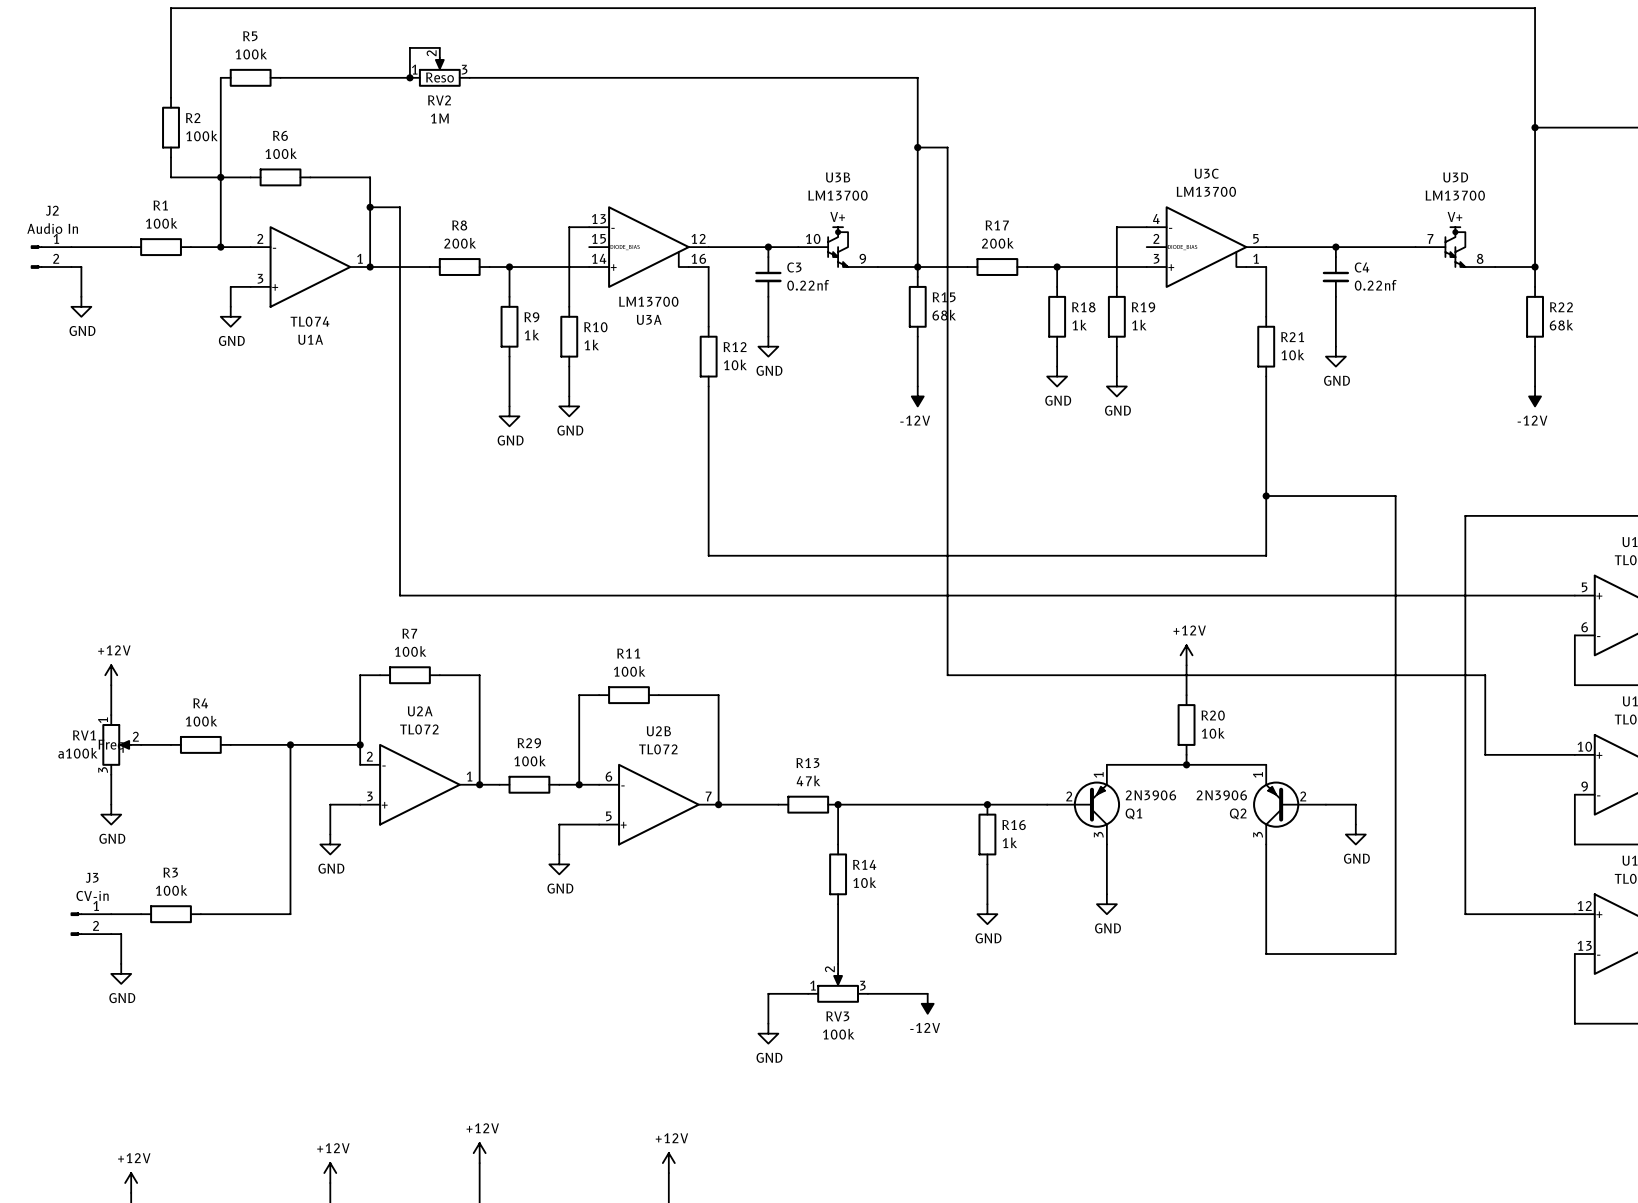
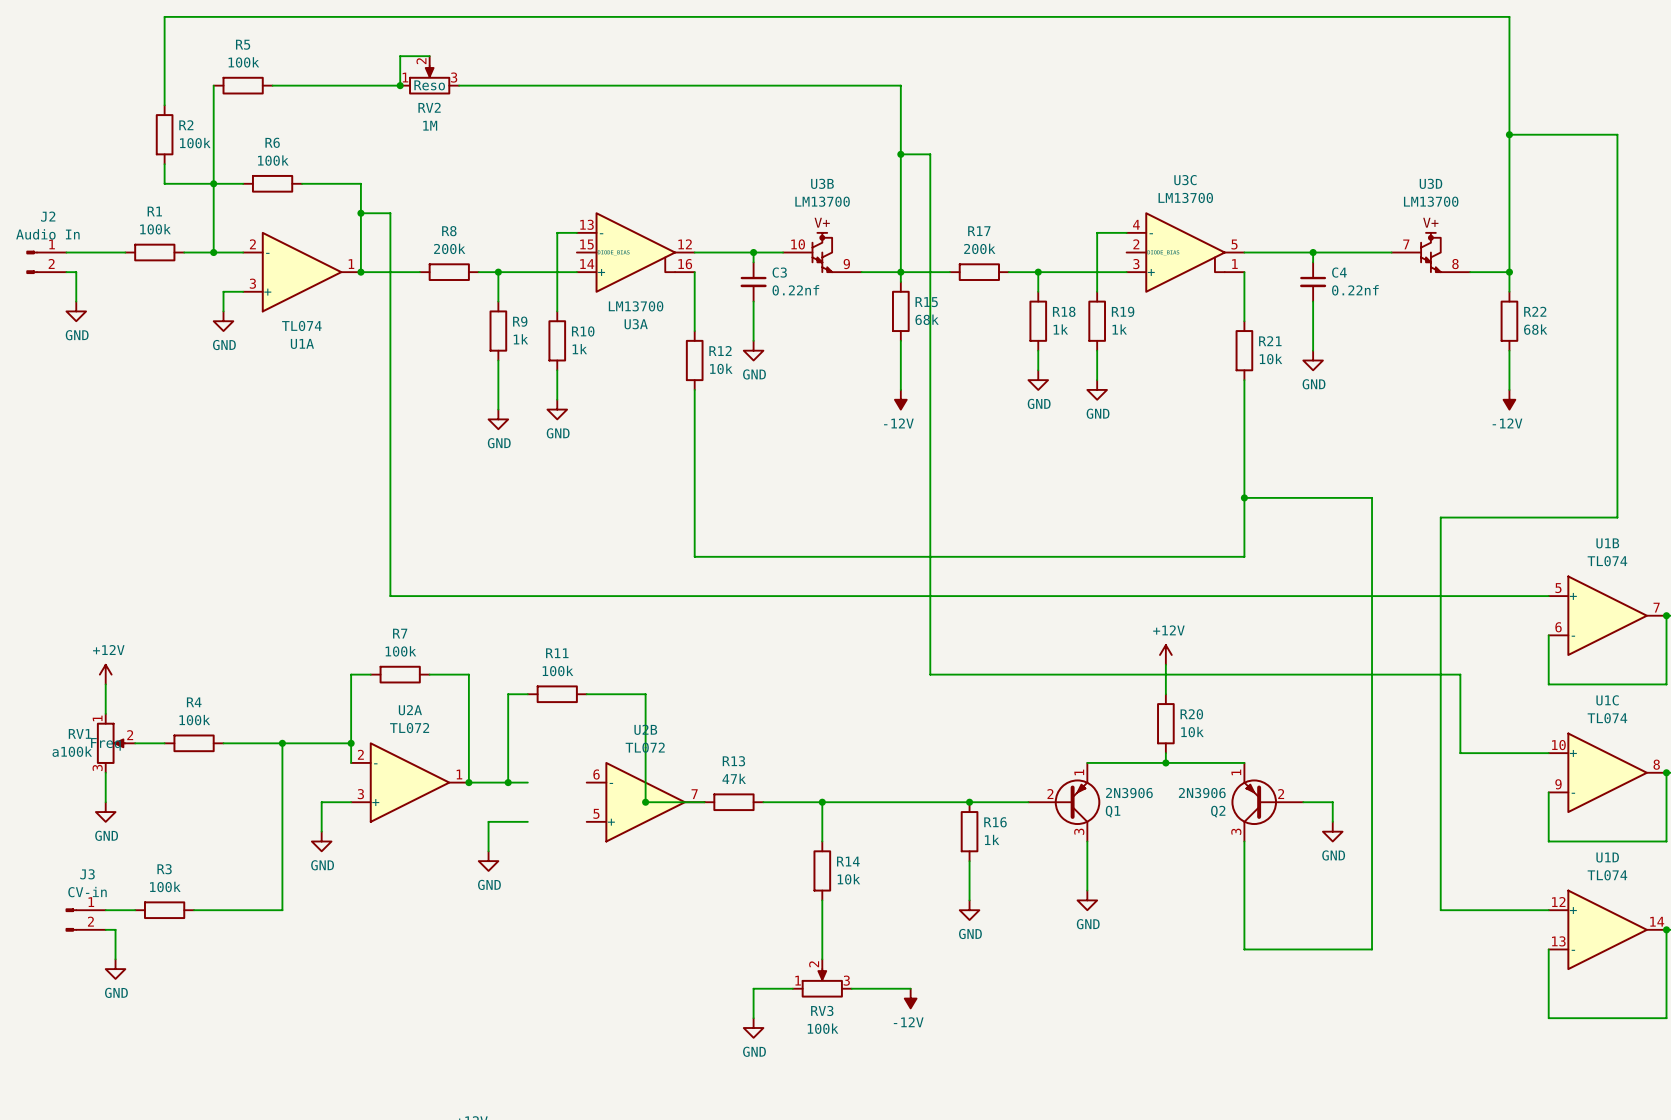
wire: none -> (527, 694) (508, 694) (508, 782)
wire: (599, 695) (579, 695) (579, 784) -> (586, 694) (645, 694) (645, 802) (704, 802)
R11 position: (628, 695) -> (557, 694)
wire: (658, 695) (718, 695) (718, 804) (778, 804) -> (822, 802) (763, 802)
junction: none -> (508, 782)
R29: 100k (529, 784) -> none
wire: (559, 784) (599, 784) -> (488, 782) (527, 782)
junction: (579, 784) -> none
junction: none -> (645, 802)
junction: (718, 804) -> none
R13 position: (808, 804) -> (733, 802)
wire: (599, 824) (559, 824) (559, 854) -> (527, 821) (488, 821) (488, 851)
power symbol position: GND (559, 864) -> GND (488, 861)

